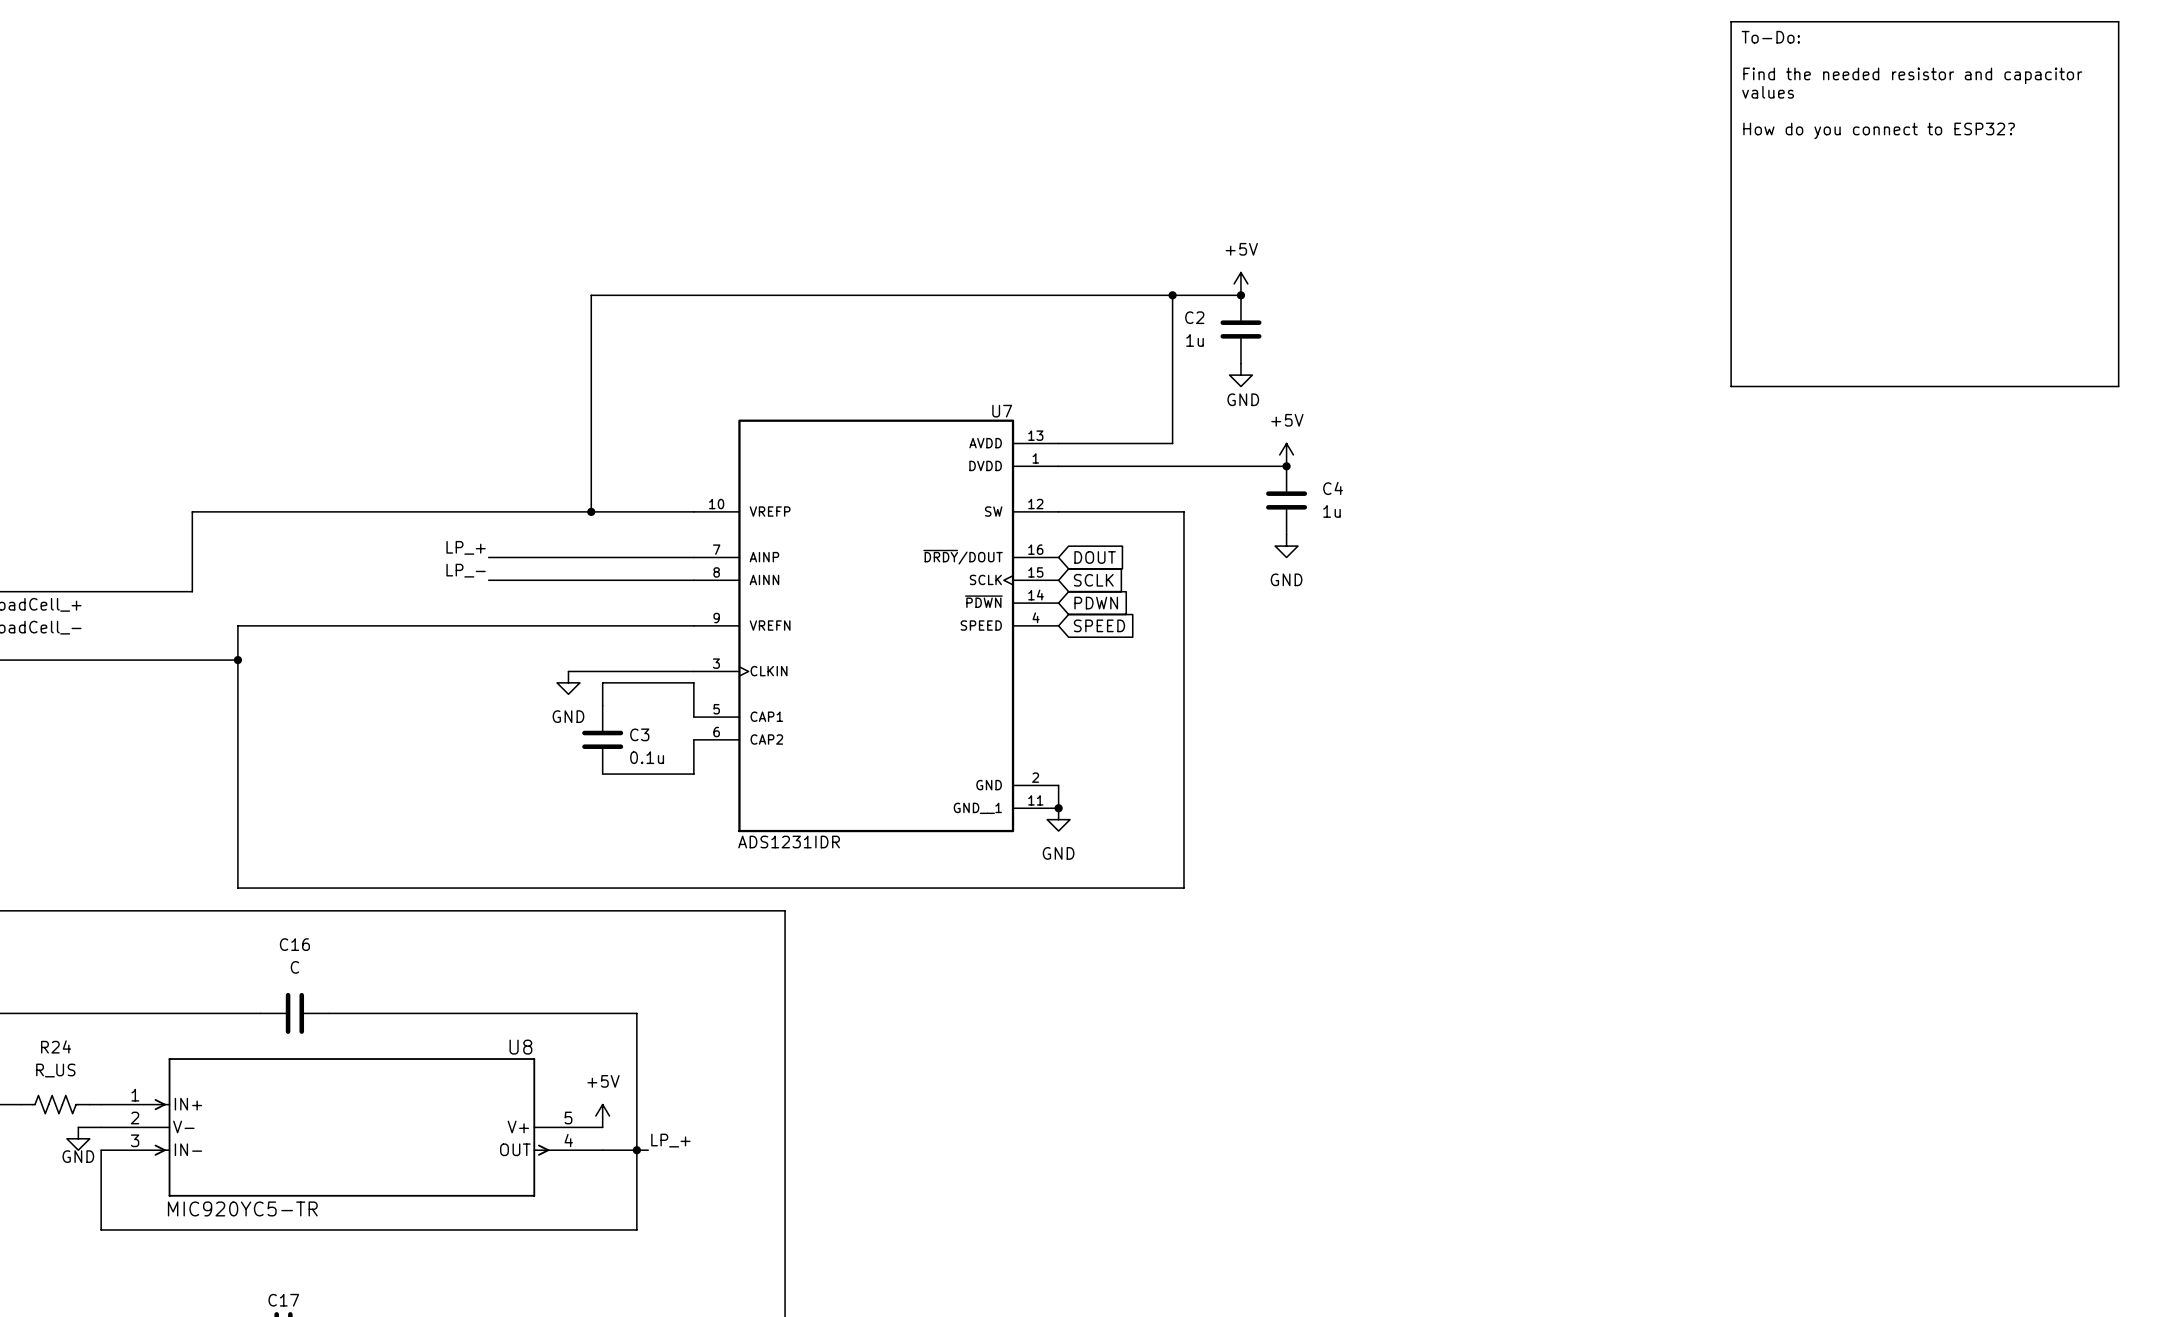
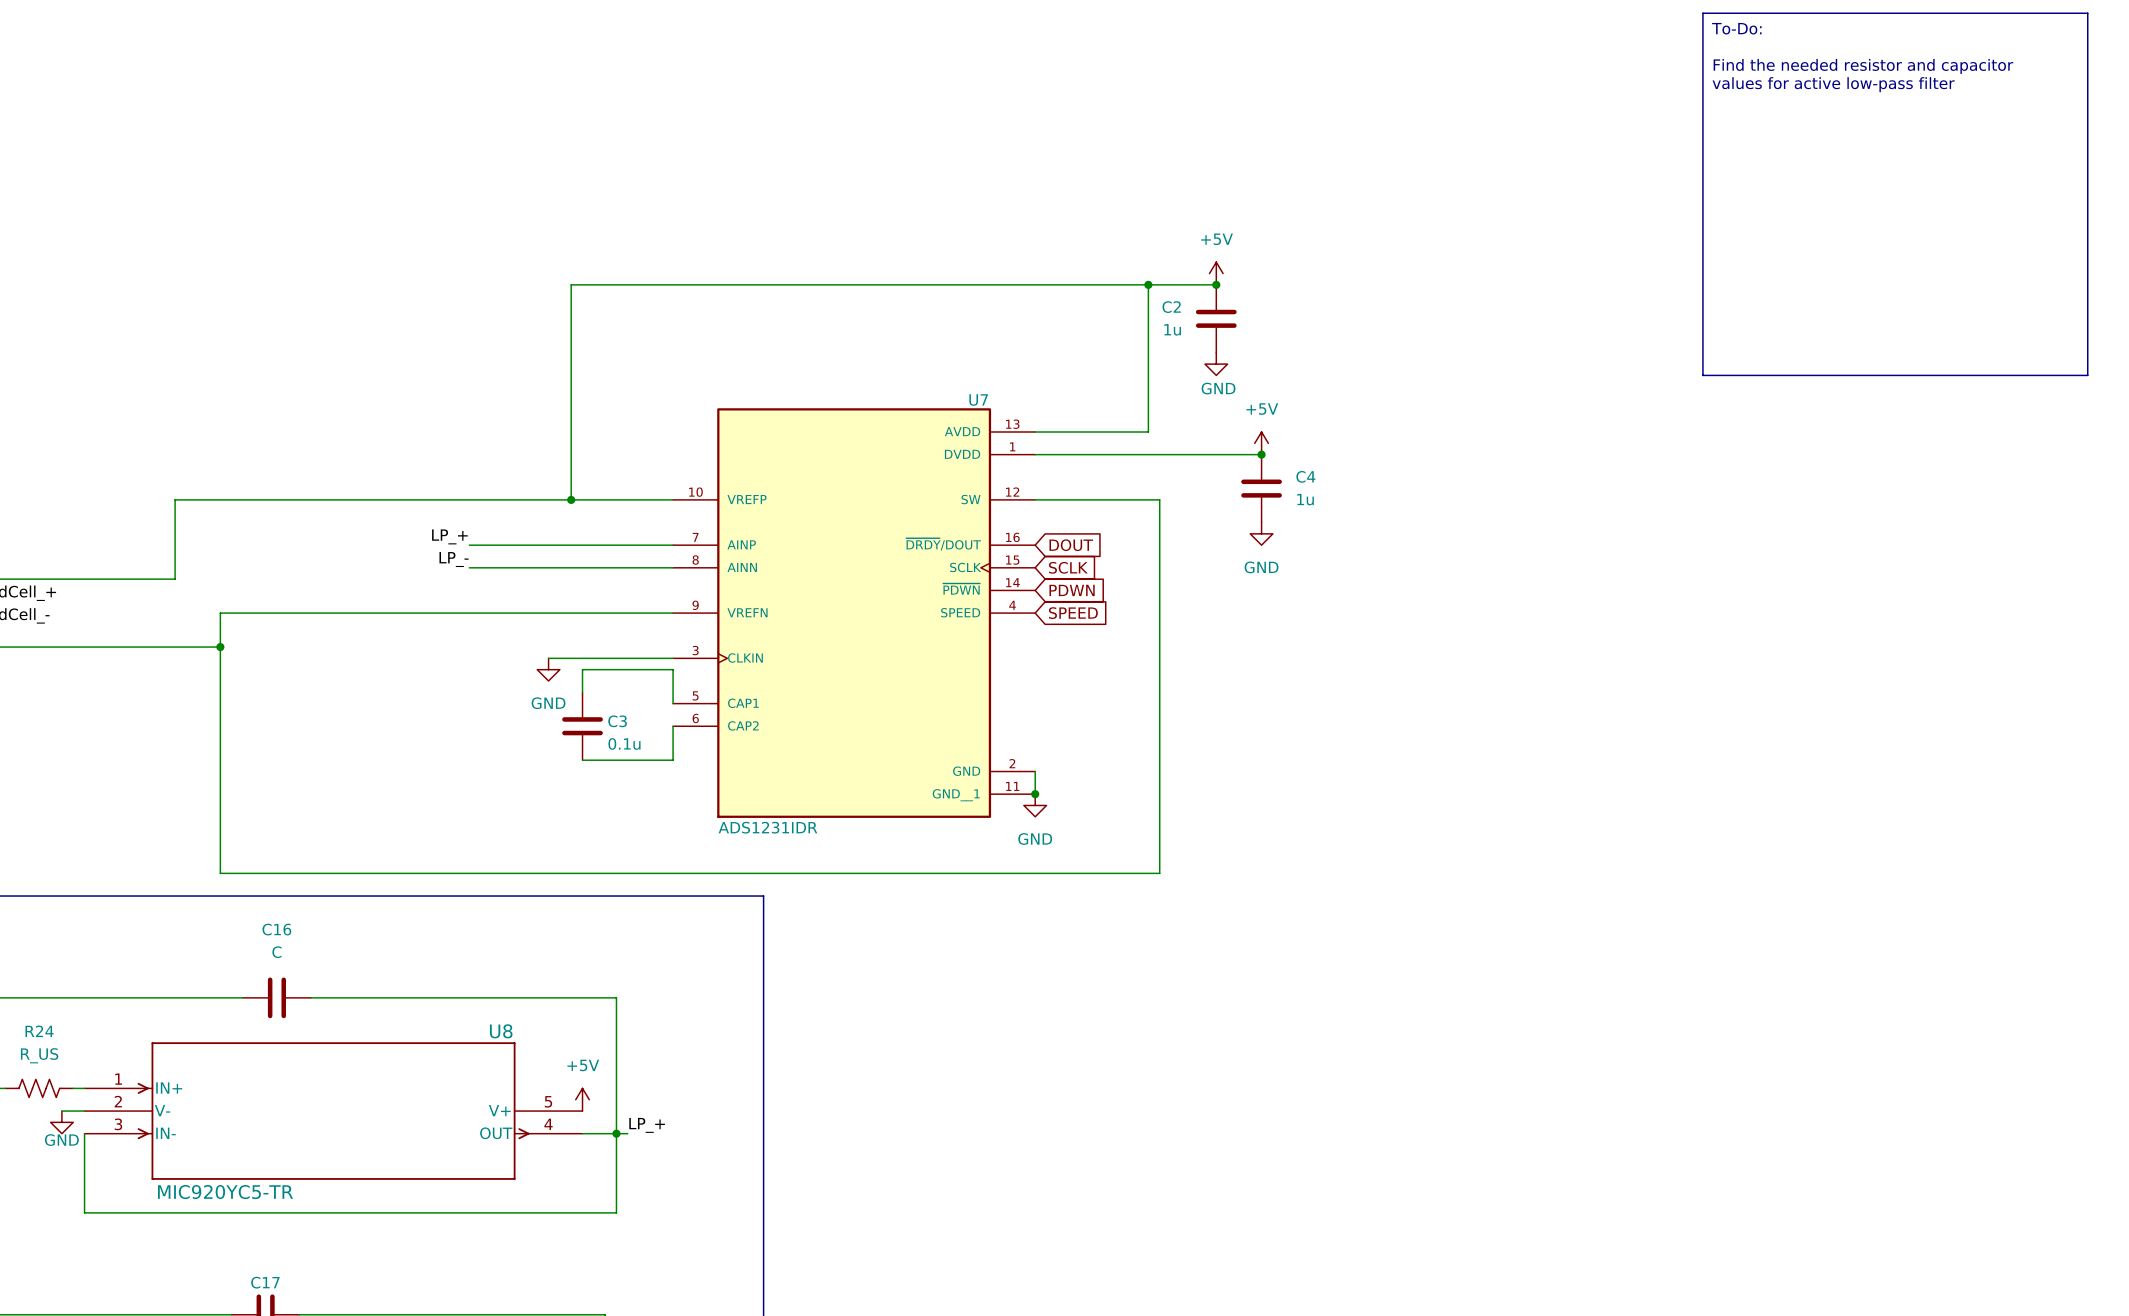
text: values (1768, 92) -> values for active low-pass filter (1833, 84)
text: How do you connect to ESP32? (1879, 130) -> none

